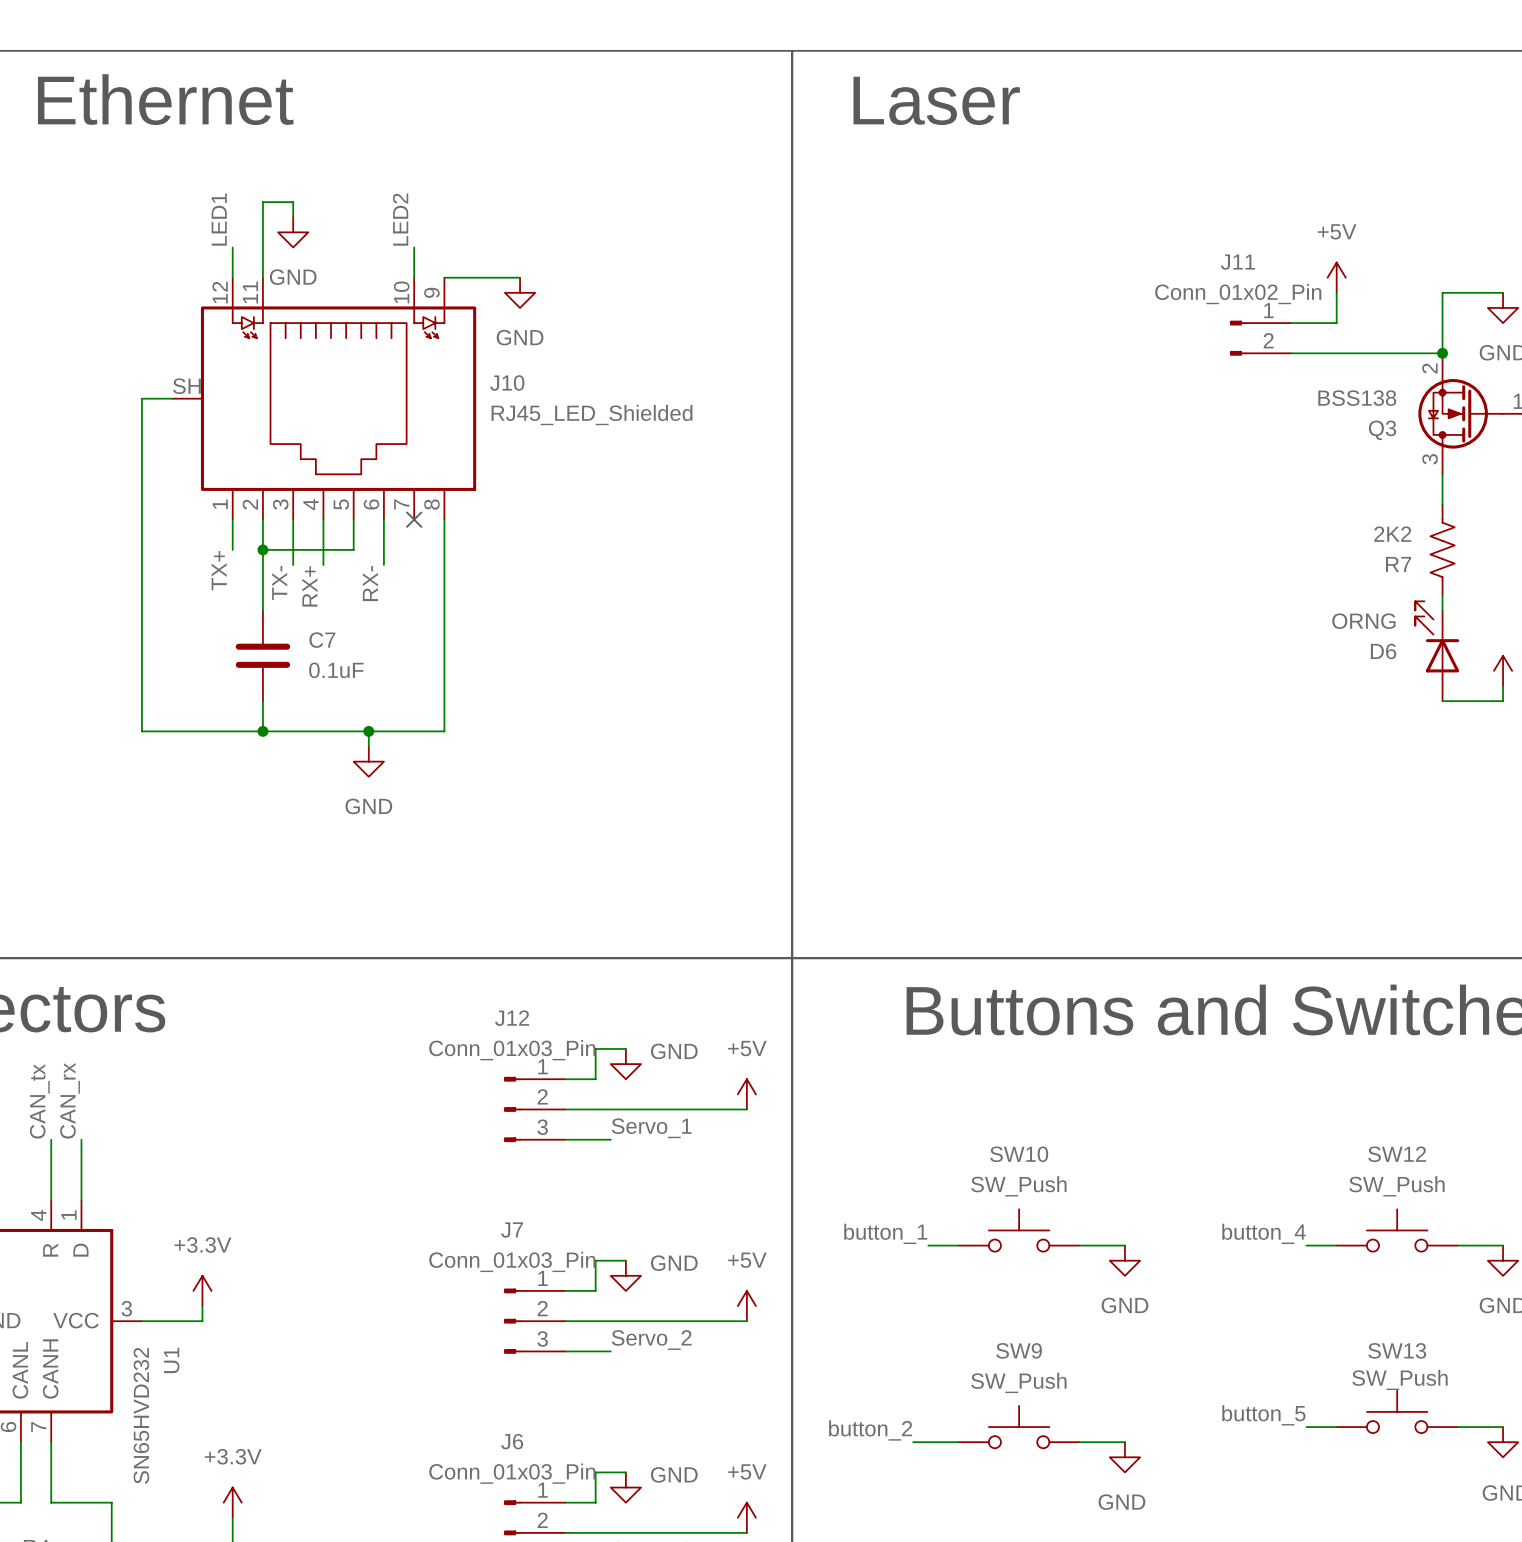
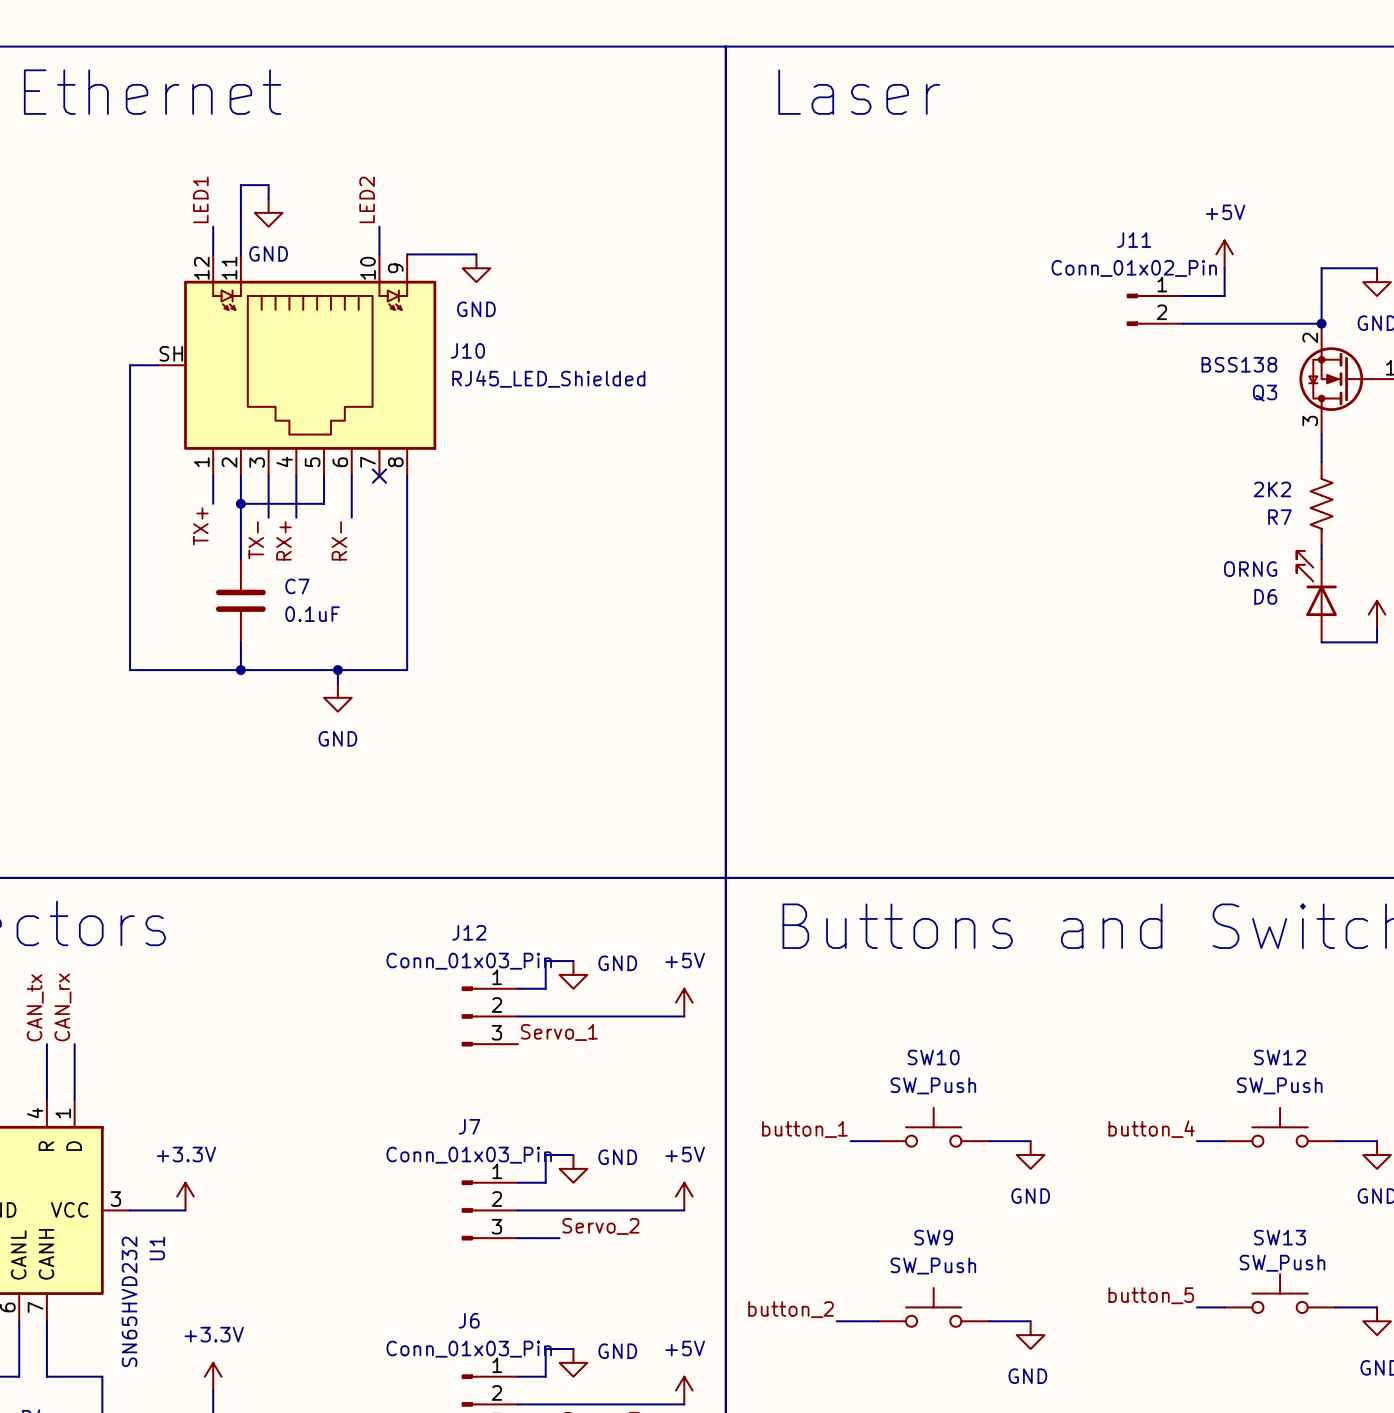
label position: Servo_1 (651, 1128) -> Servo_1 (559, 1032)
wire: (565, 1139) (610, 1139) -> none
power symbol position: +3.3V (202, 1290) -> +3.3V (185, 1196)

